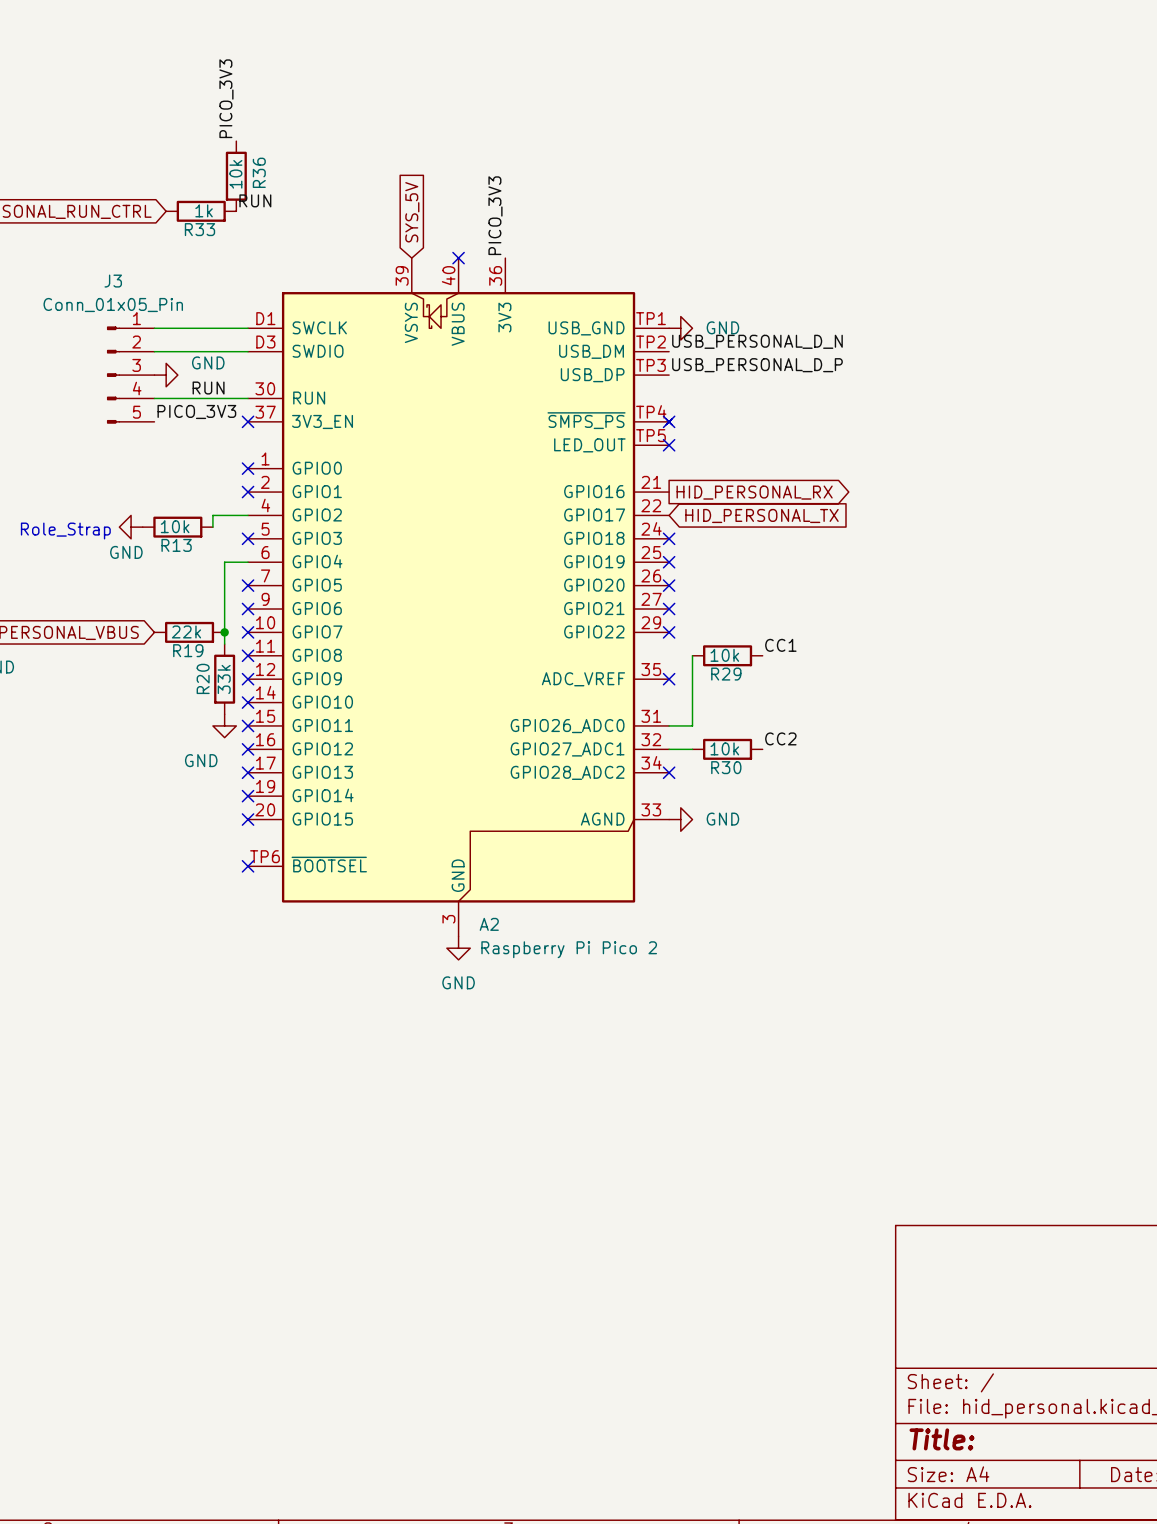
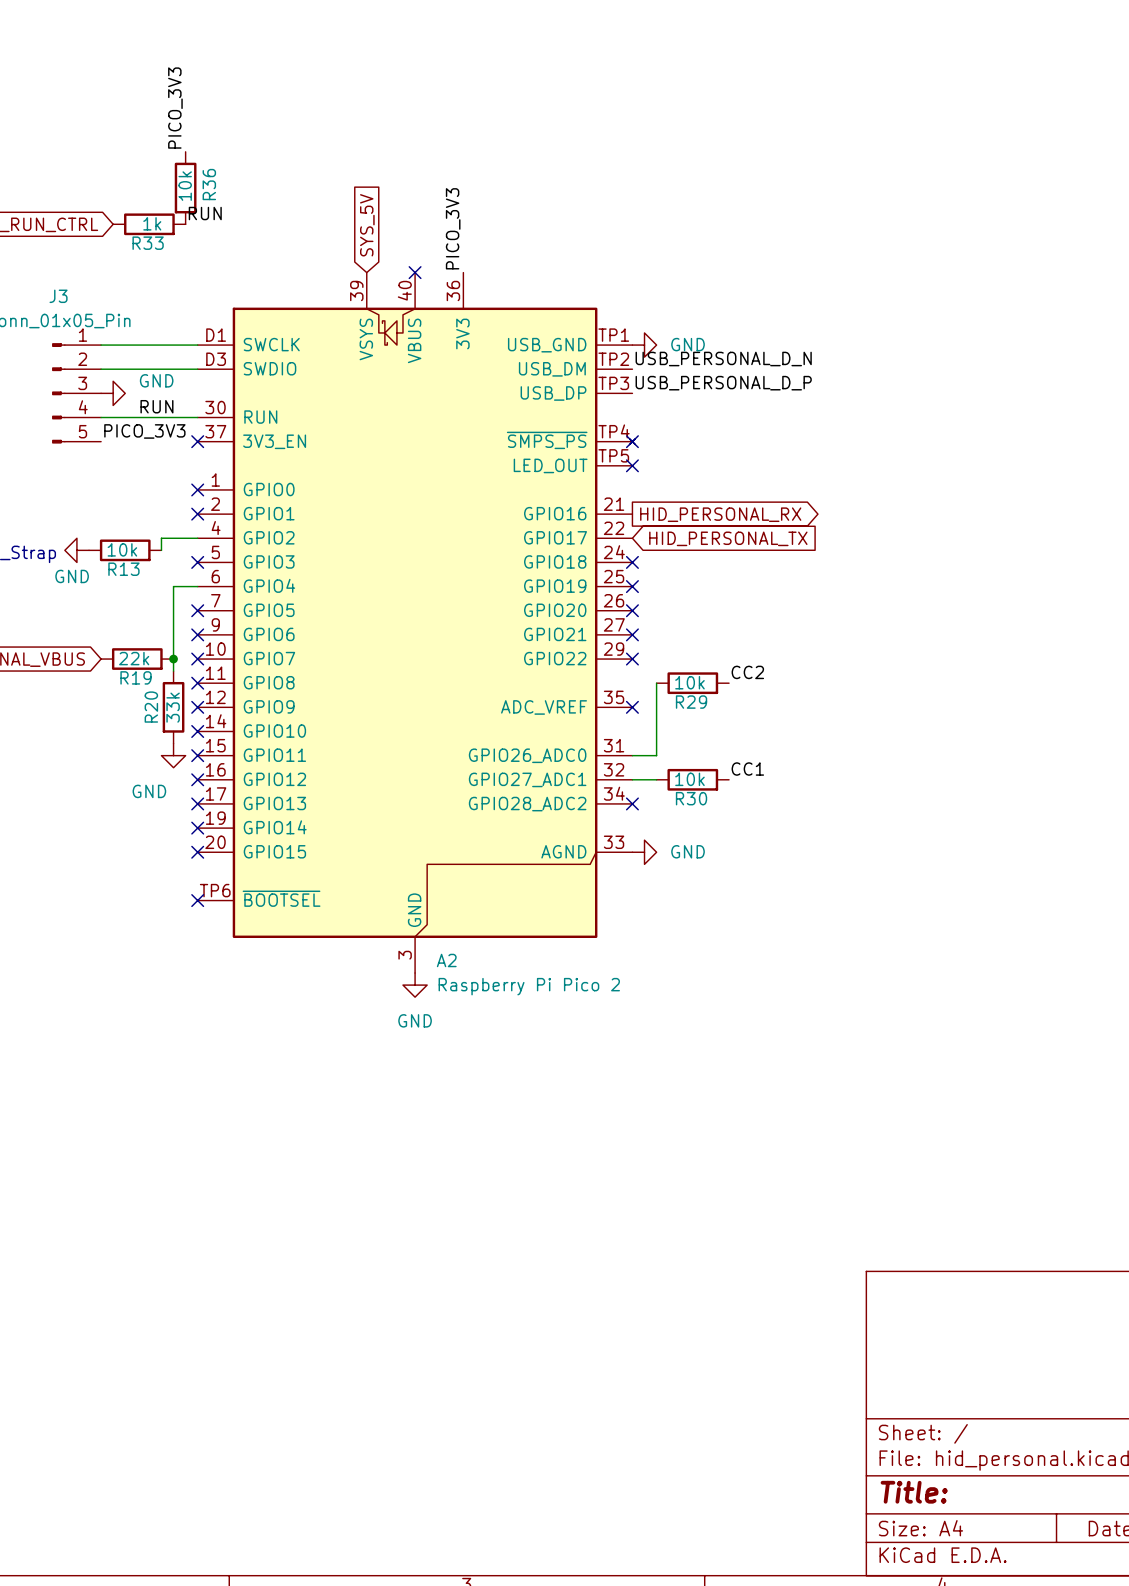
label: CC1 (780, 645) -> CC2 (747, 672)
label: CC2 (780, 738) -> CC1 (747, 769)

